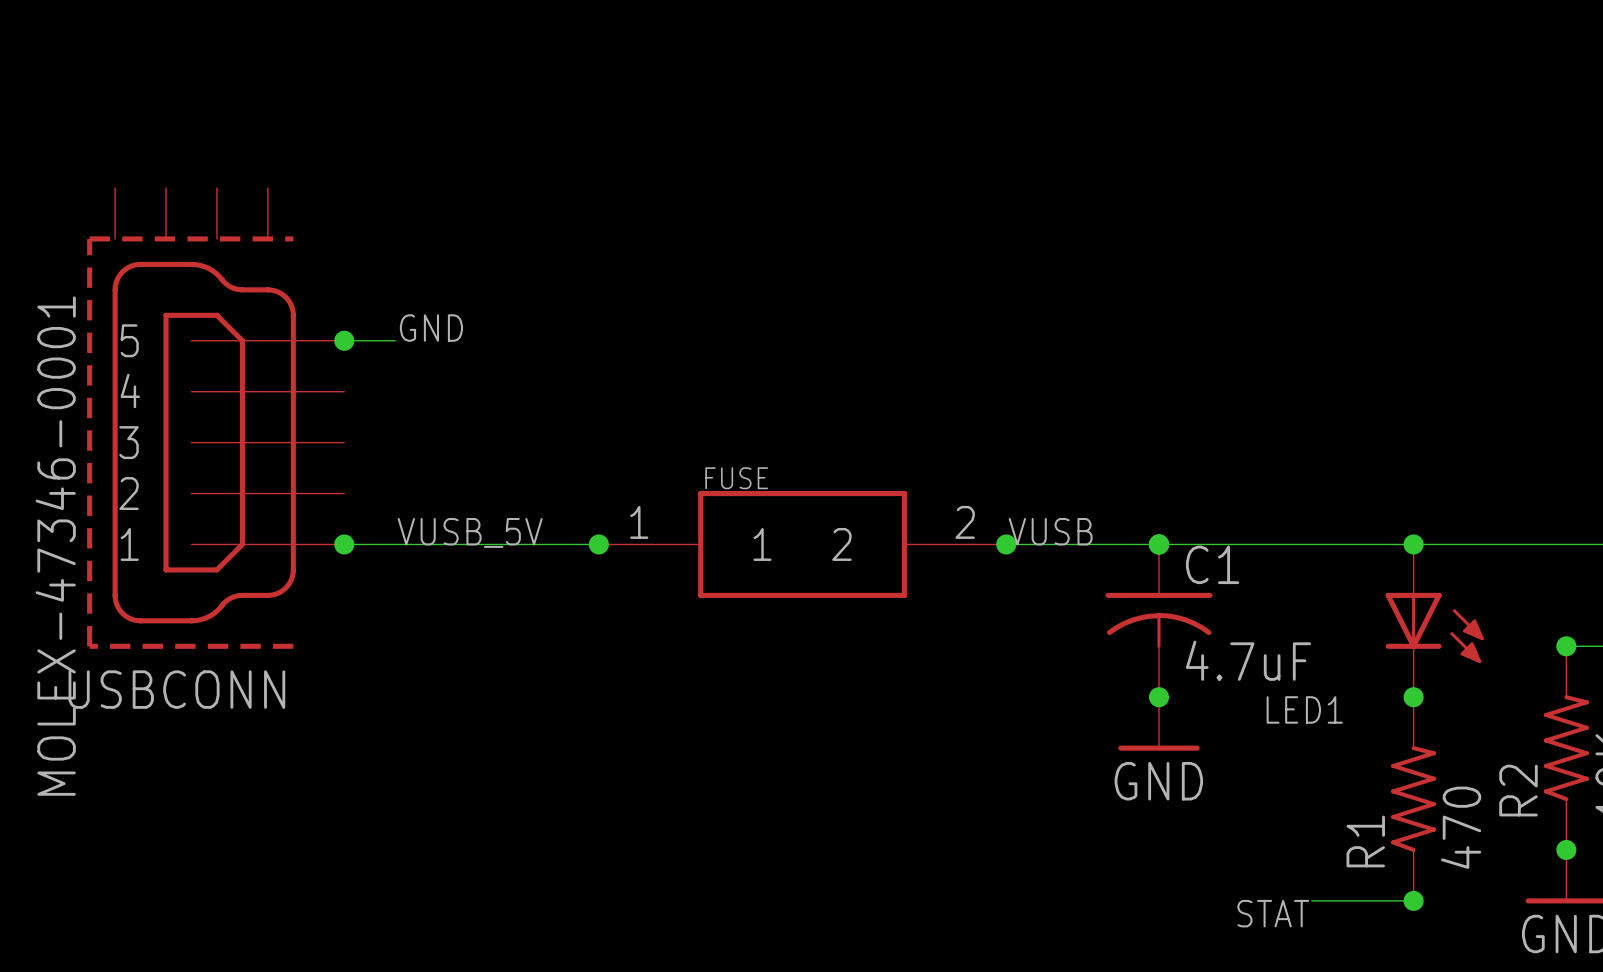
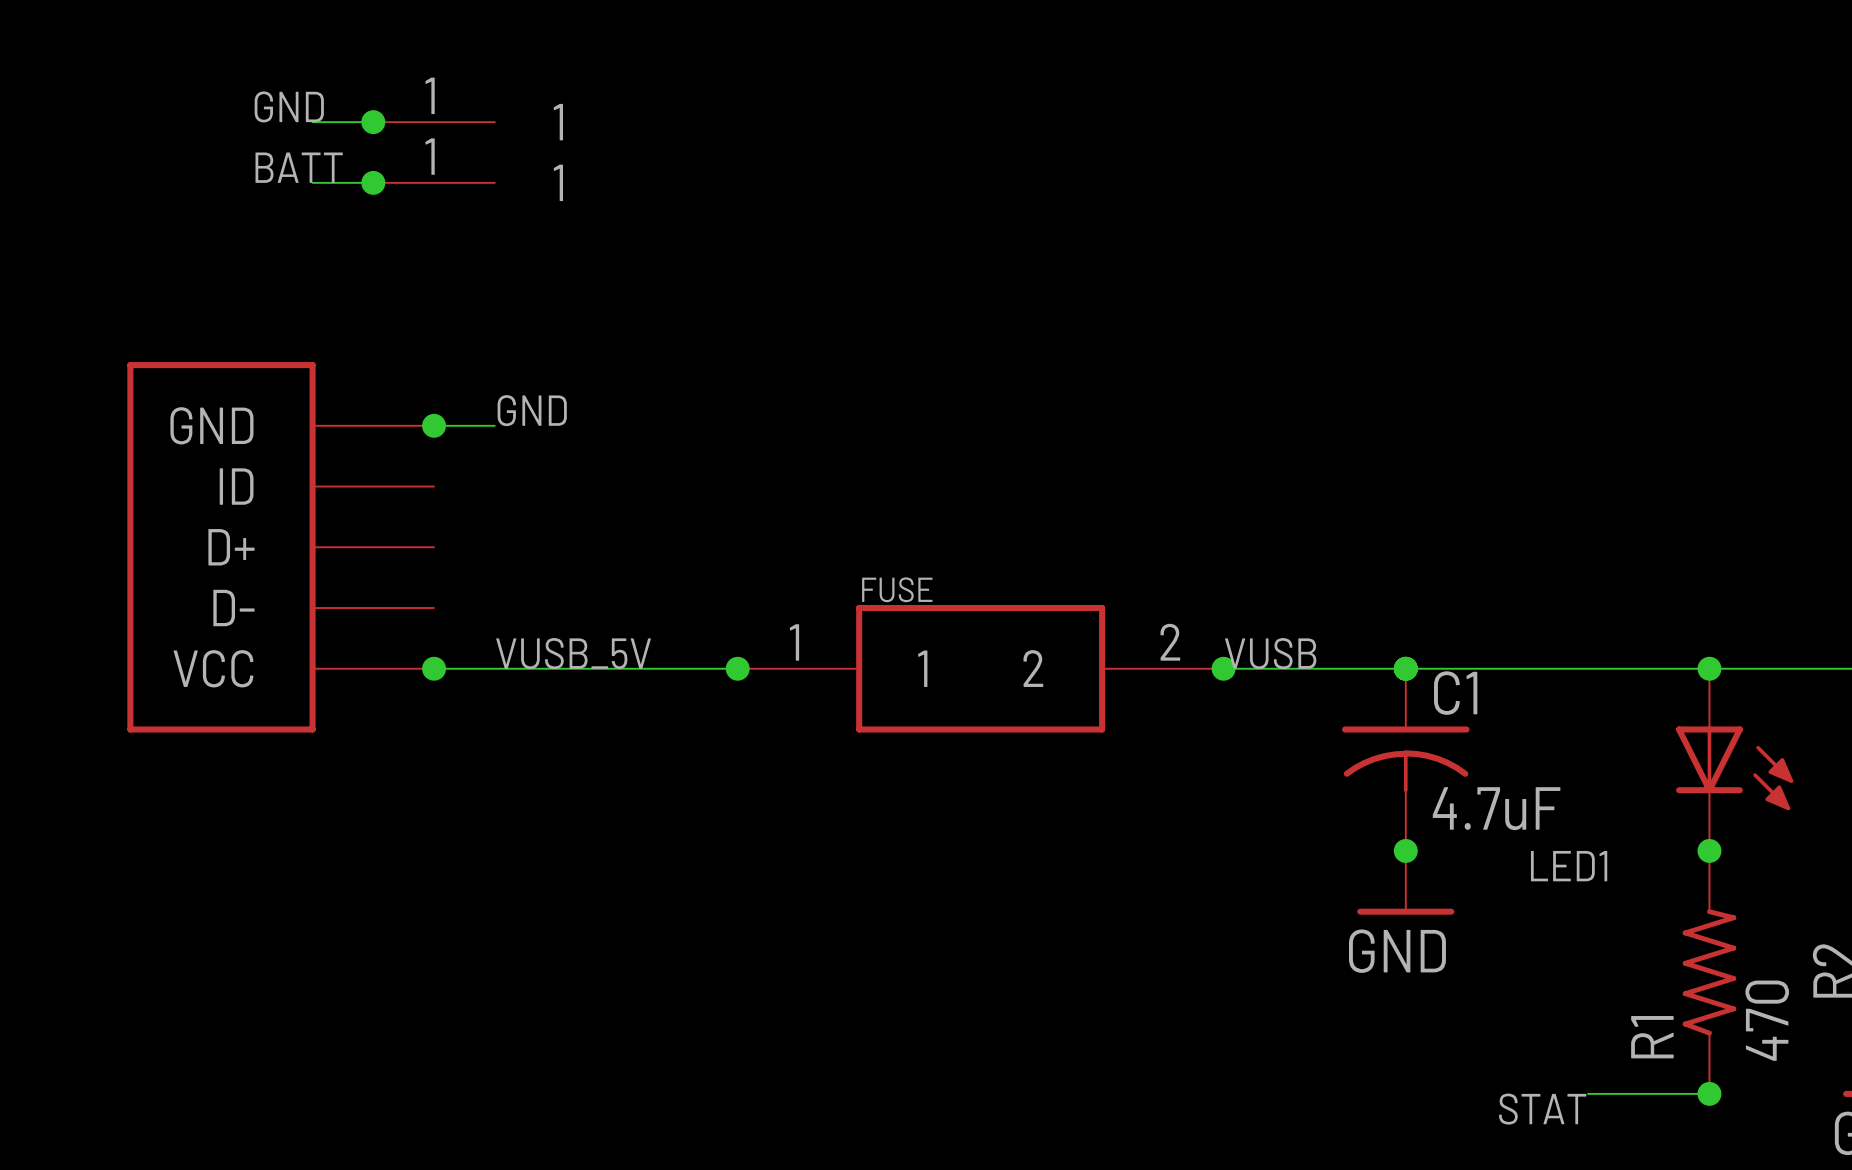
label: none -> GND (289, 106)
wire: none -> (312, 122) (373, 122)
junction: none -> (373, 122)
part: none -> (434, 122)
label: none -> BATT (299, 167)
wire: none -> (312, 182) (373, 182)
junction: none -> (373, 182)
part: none -> (434, 182)
USBCONN: MOLEX-47346-0001 (215, 418) -> none
part: none -> (280, 547)

